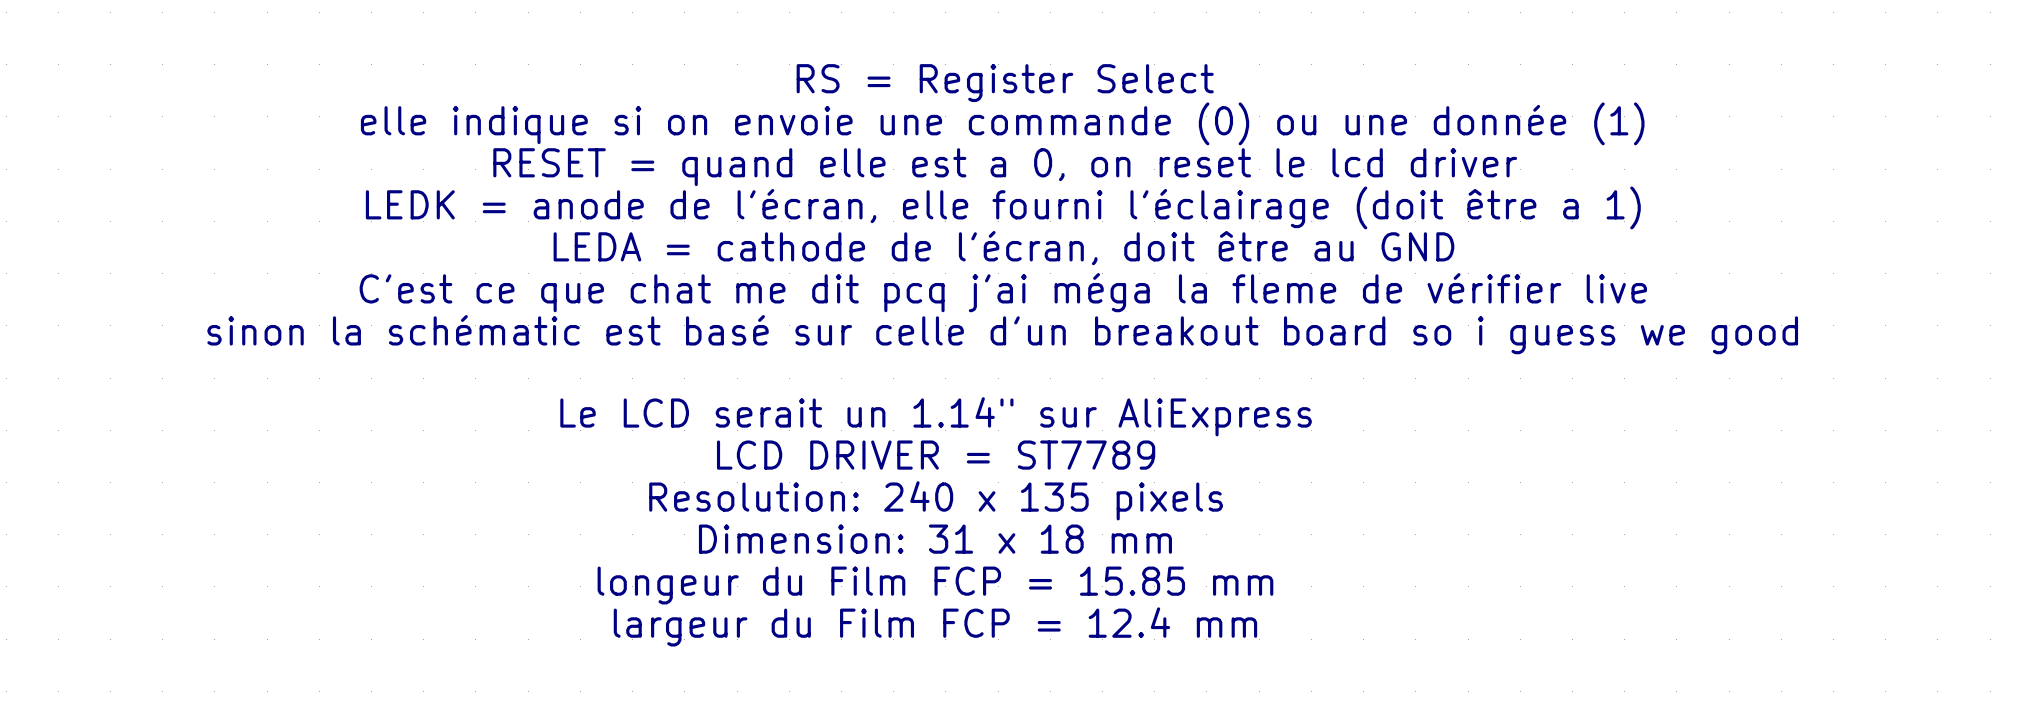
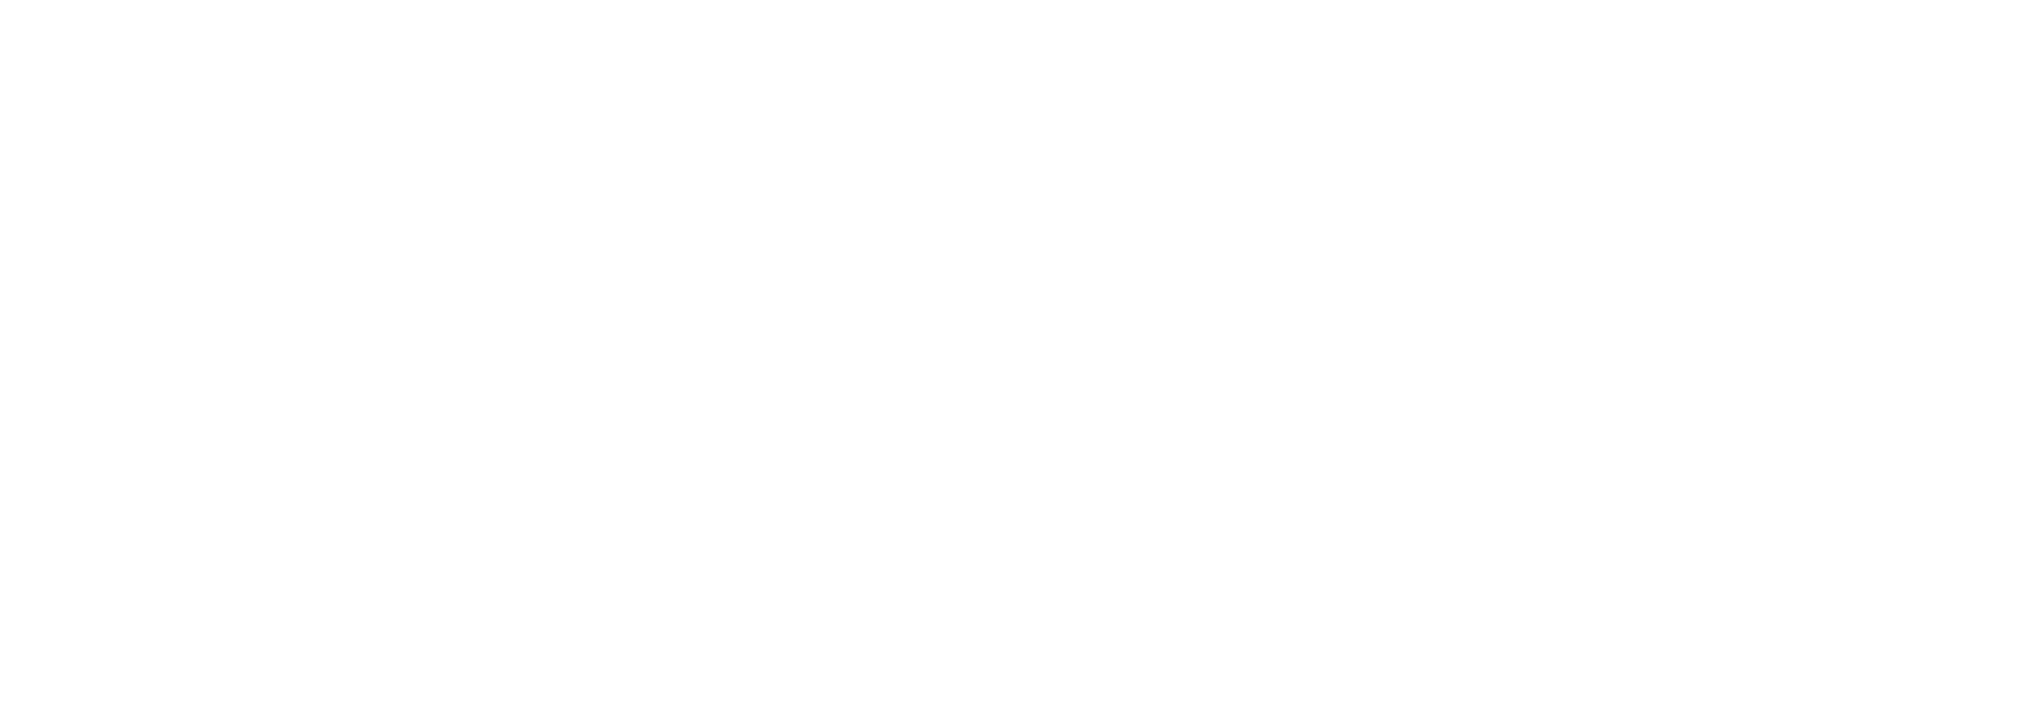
text: RS = Register Select (1005, 83) -> none
text: elle indique si on envoie une commande (0) ou une donnée (1) (1002, 123) -> none
text: RESET = quand elle est a 0, on reset le lcd driver (1005, 167) -> none
text: LEDK = anode de l'écran, elle fourni l'éclairage (doit être a 1) (1003, 207) -> none
text: LEDA = cathode de l'écran, doit être au GND (1003, 248) -> none
text: C'est ce que chat me dit pcq j'ai méga la fleme de vérifier live (1003, 292) -> none
text: sinon la schématic est basé sur celle d'un breakout board so i guess we good (1002, 334) -> none
text: Le LCD serait un 1.14" sur AliExpress (936, 416) -> none
text: LCD DRIVER = ST7789 (936, 455) -> none
text: Resolution: 240 x 135 pixels (936, 500) -> none
text: Dimension: 31 x 18 mm (935, 539) -> none
text: longeur du Film FCP = 15.85 mm (935, 585) -> none
text: largeur du Film FCP = 12.4 mm (935, 626) -> none

